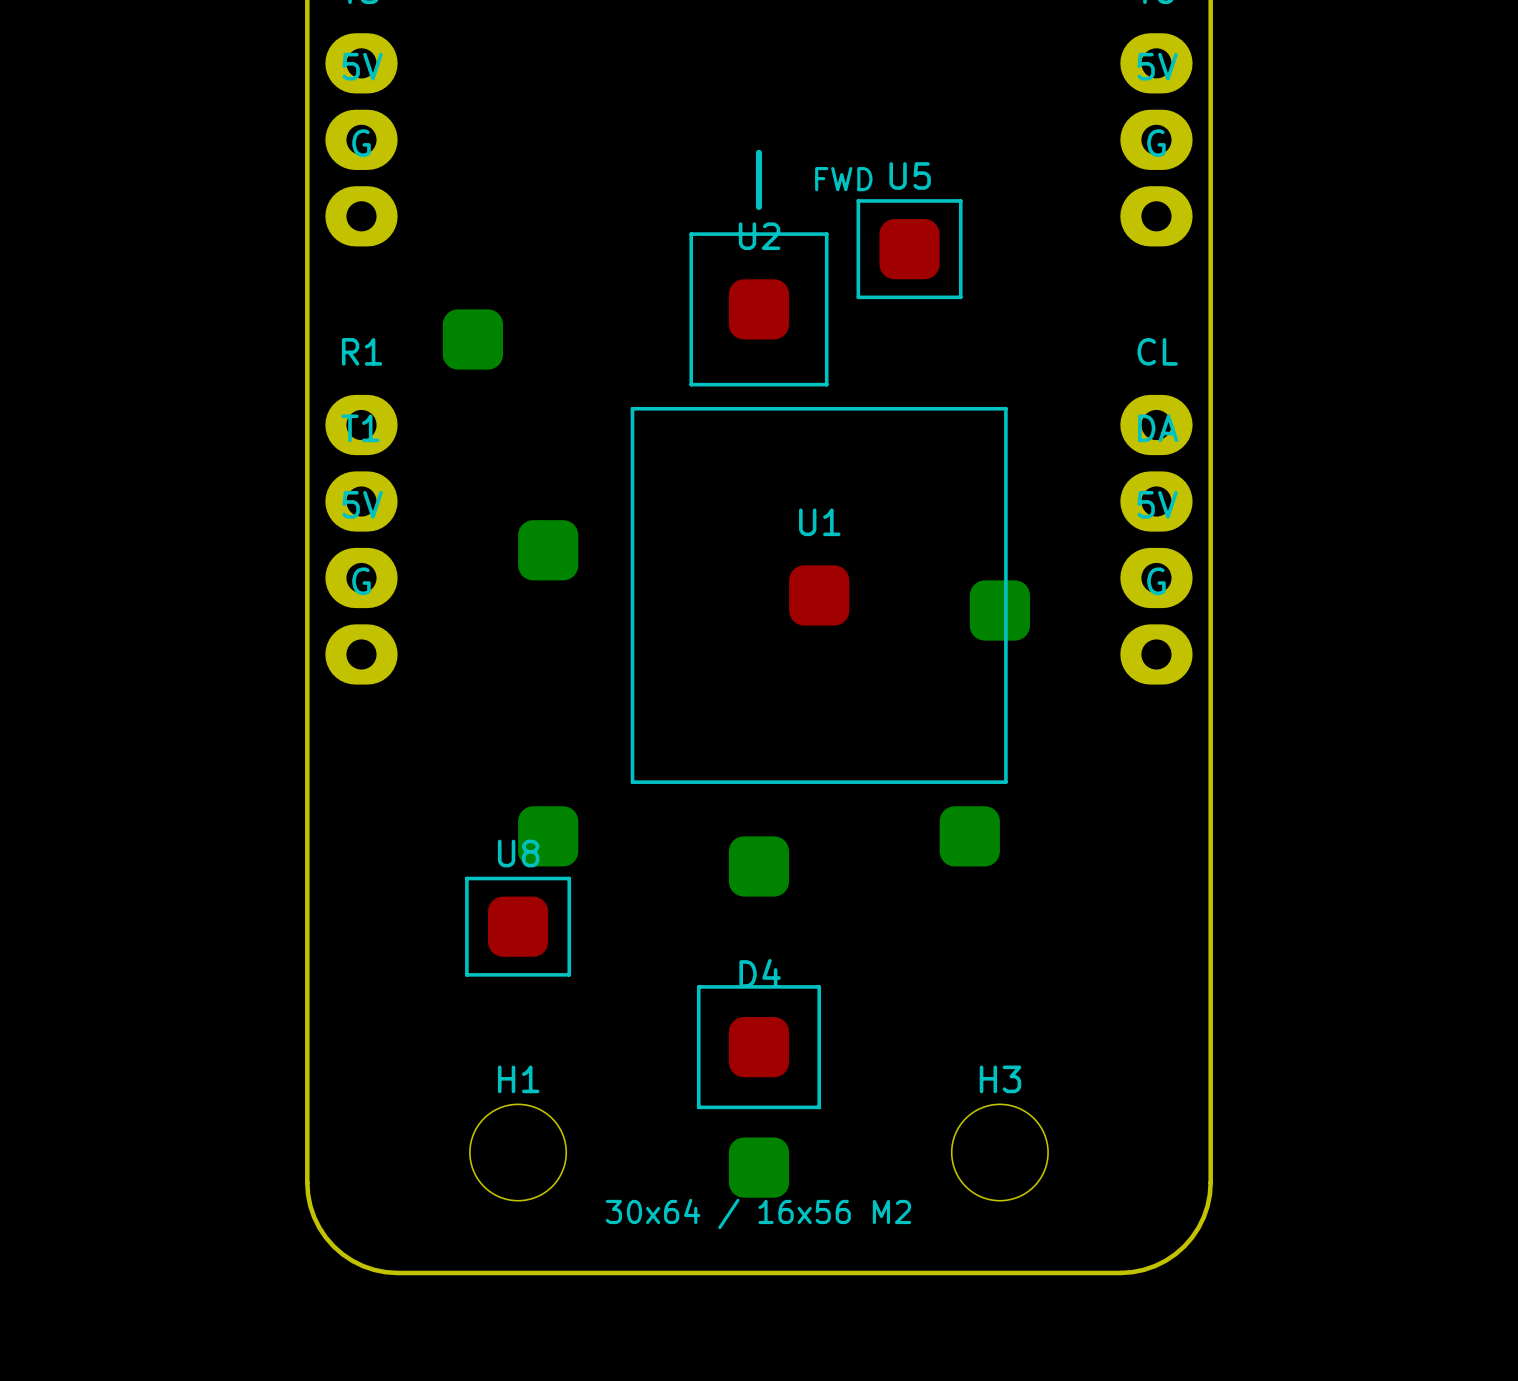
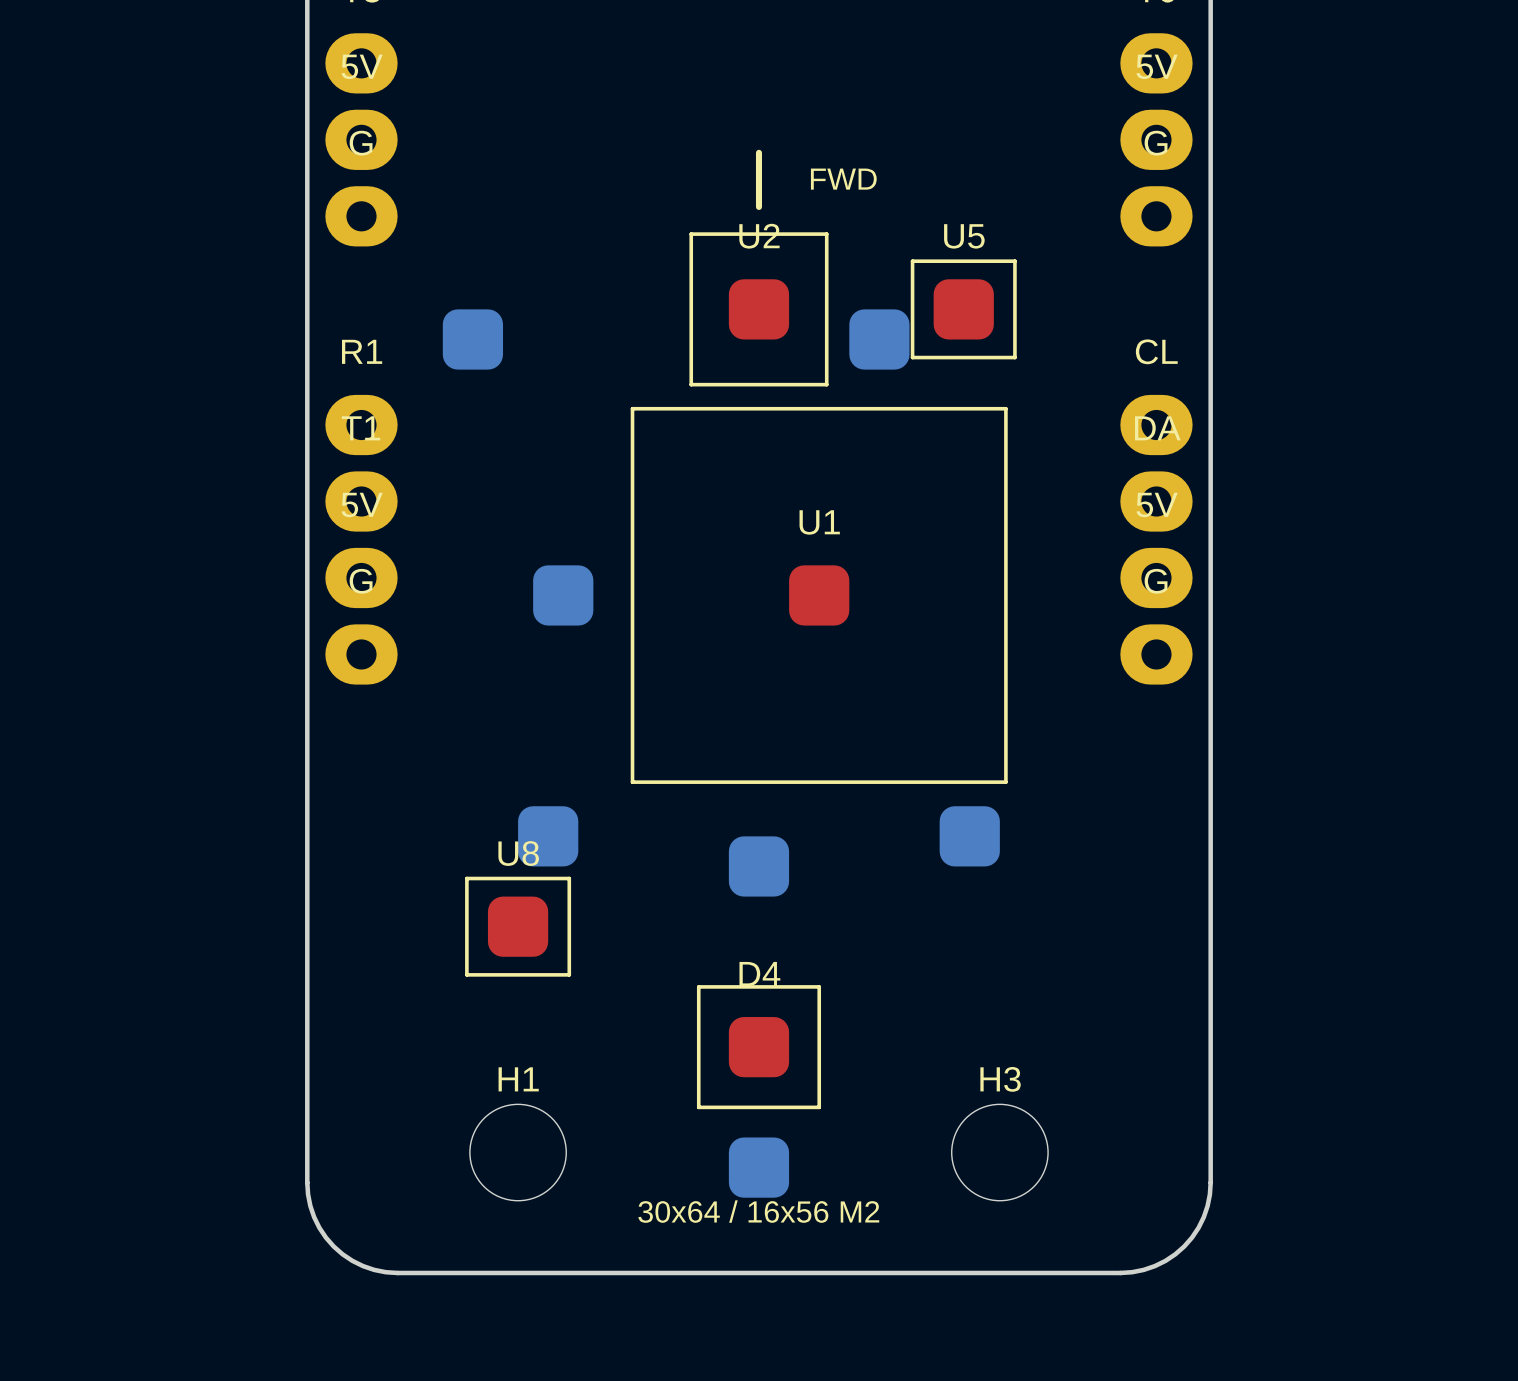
line: (858, 200) (960, 200) (960, 297) (858, 297) (858, 200) -> (912, 261) (1014, 261) (1014, 357) (912, 357) (912, 261)
U5 position: (909, 249) -> (963, 309)
part: none -> (879, 339)
part position: (548, 550) -> (563, 595)
part: (999, 610) -> none

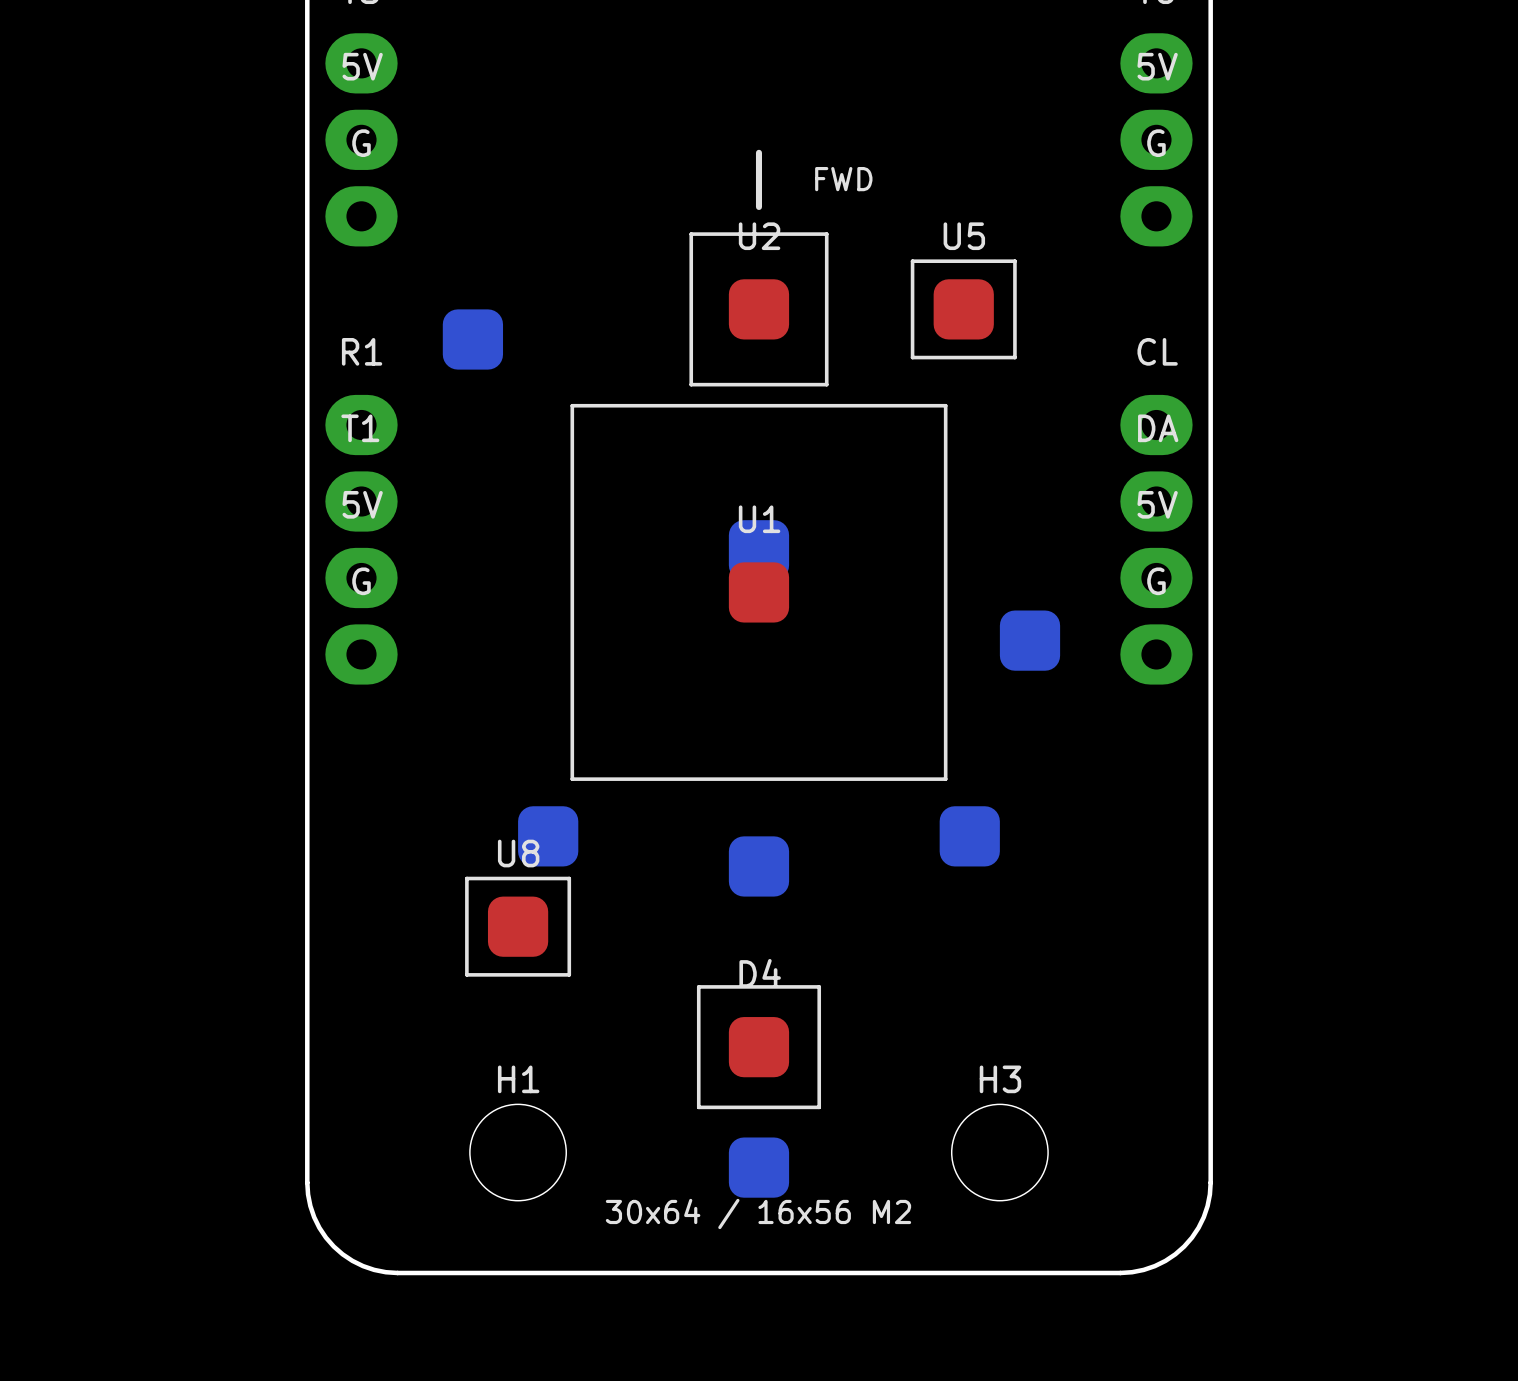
part: (879, 339) -> none
line: (632, 408) (1005, 408) (1005, 782) (632, 782) (632, 408) -> (572, 405) (572, 779) (945, 779) (945, 405) (572, 405)
part: none -> (758, 550)
part: (563, 595) -> none
U1 position: (819, 595) -> (758, 592)
part: none -> (1030, 640)

